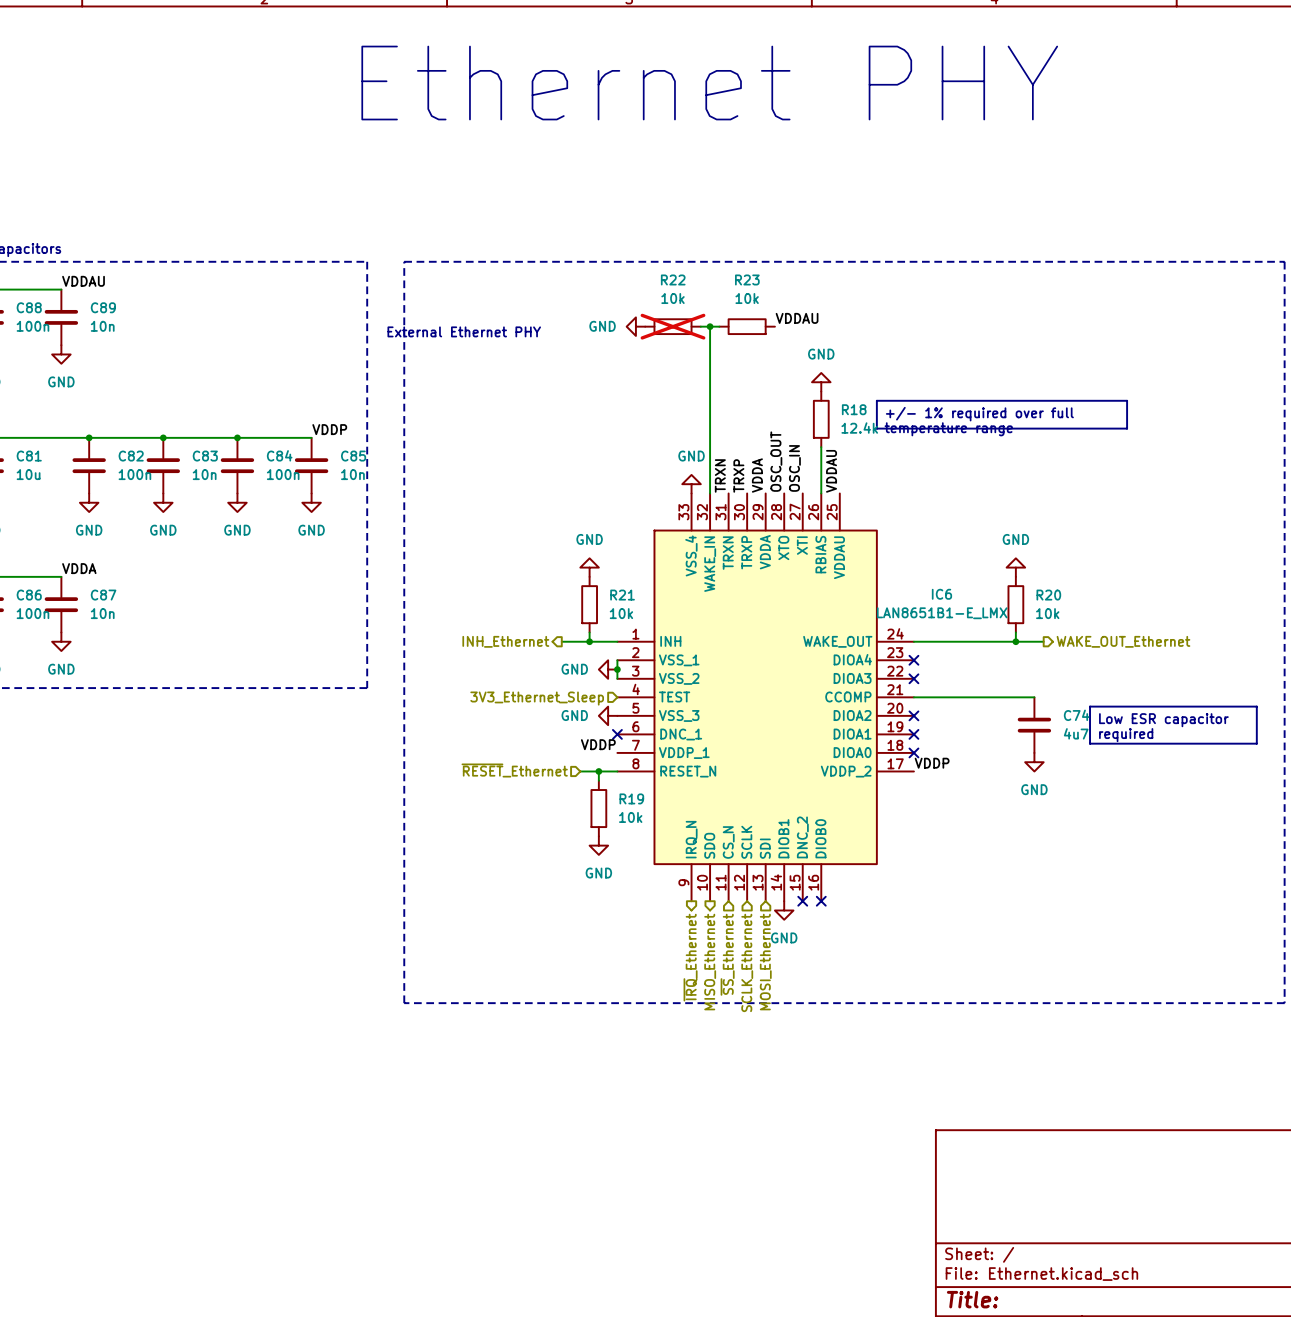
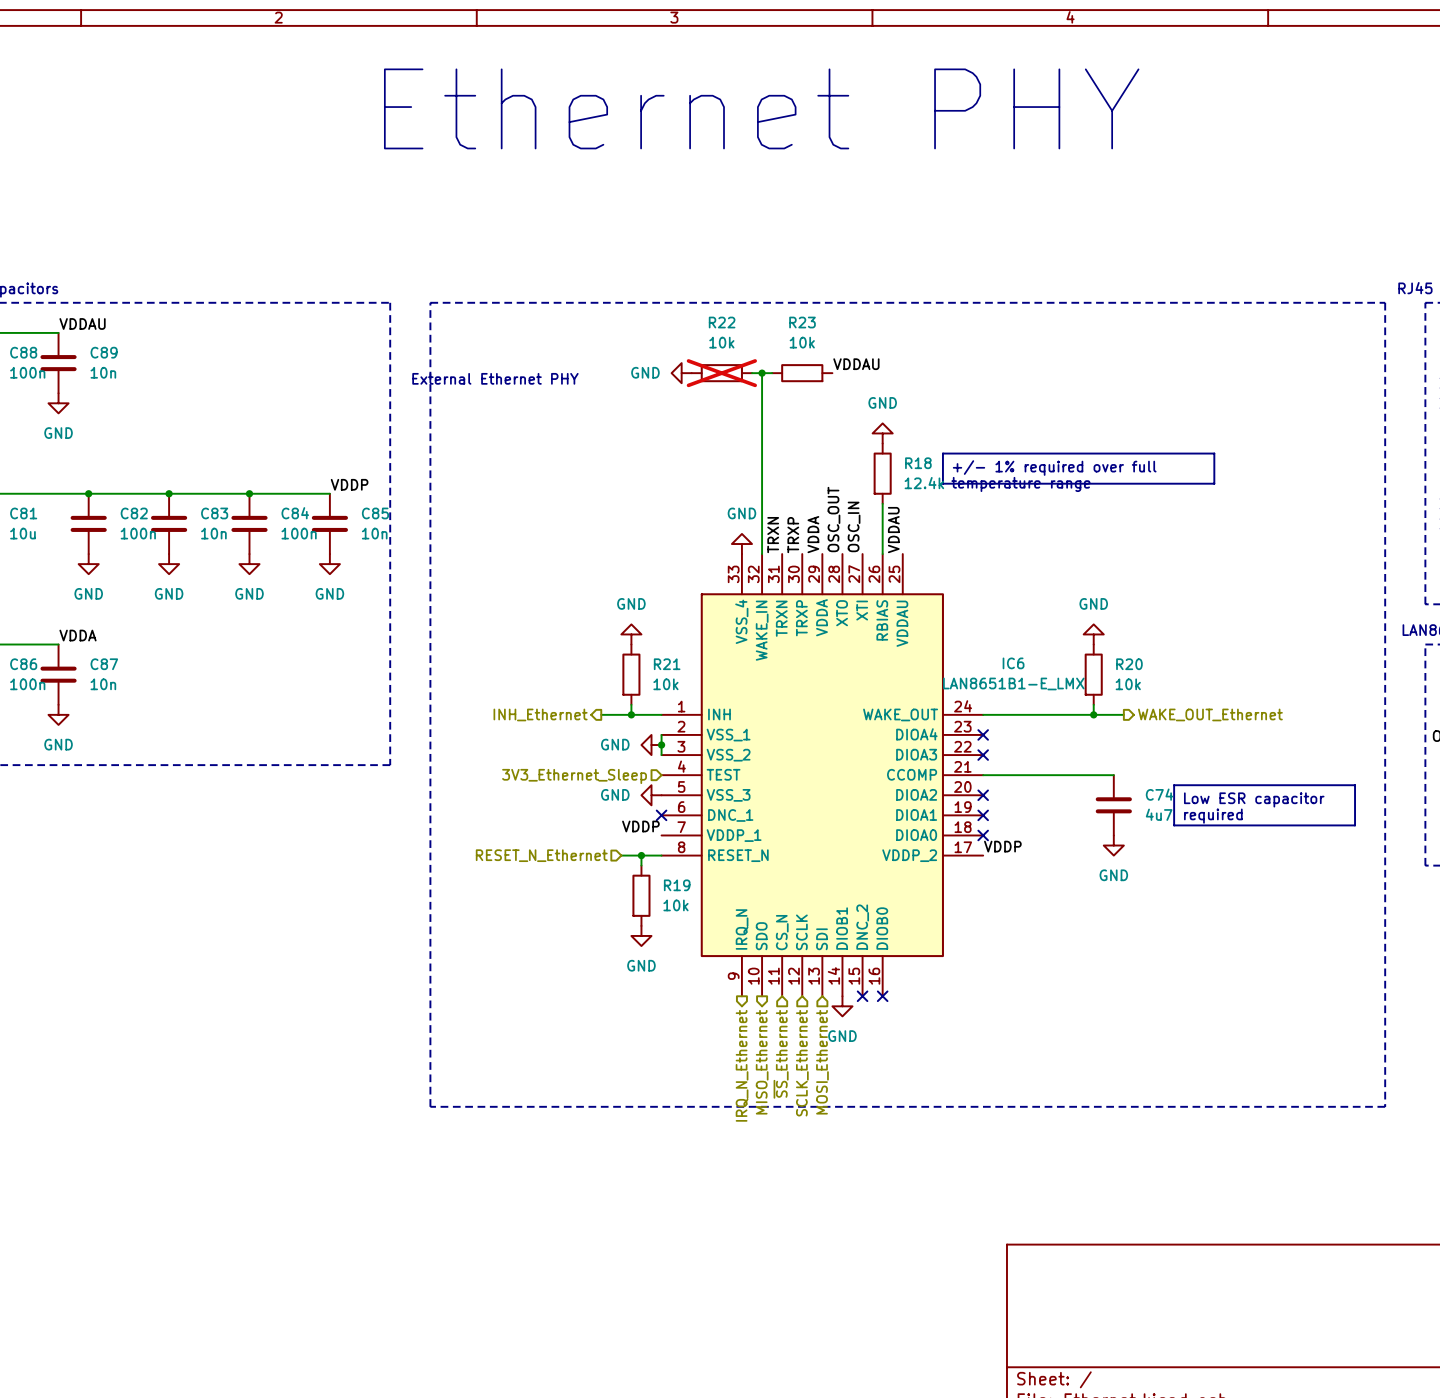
hierarchical label: ~{RESET}_Ethernet (514, 770) -> RESET_N_Ethernet (541, 855)
hierarchical label: ~{IRQ}_Ethernet (690, 957) -> IRQ_N_Ethernet (742, 1065)

